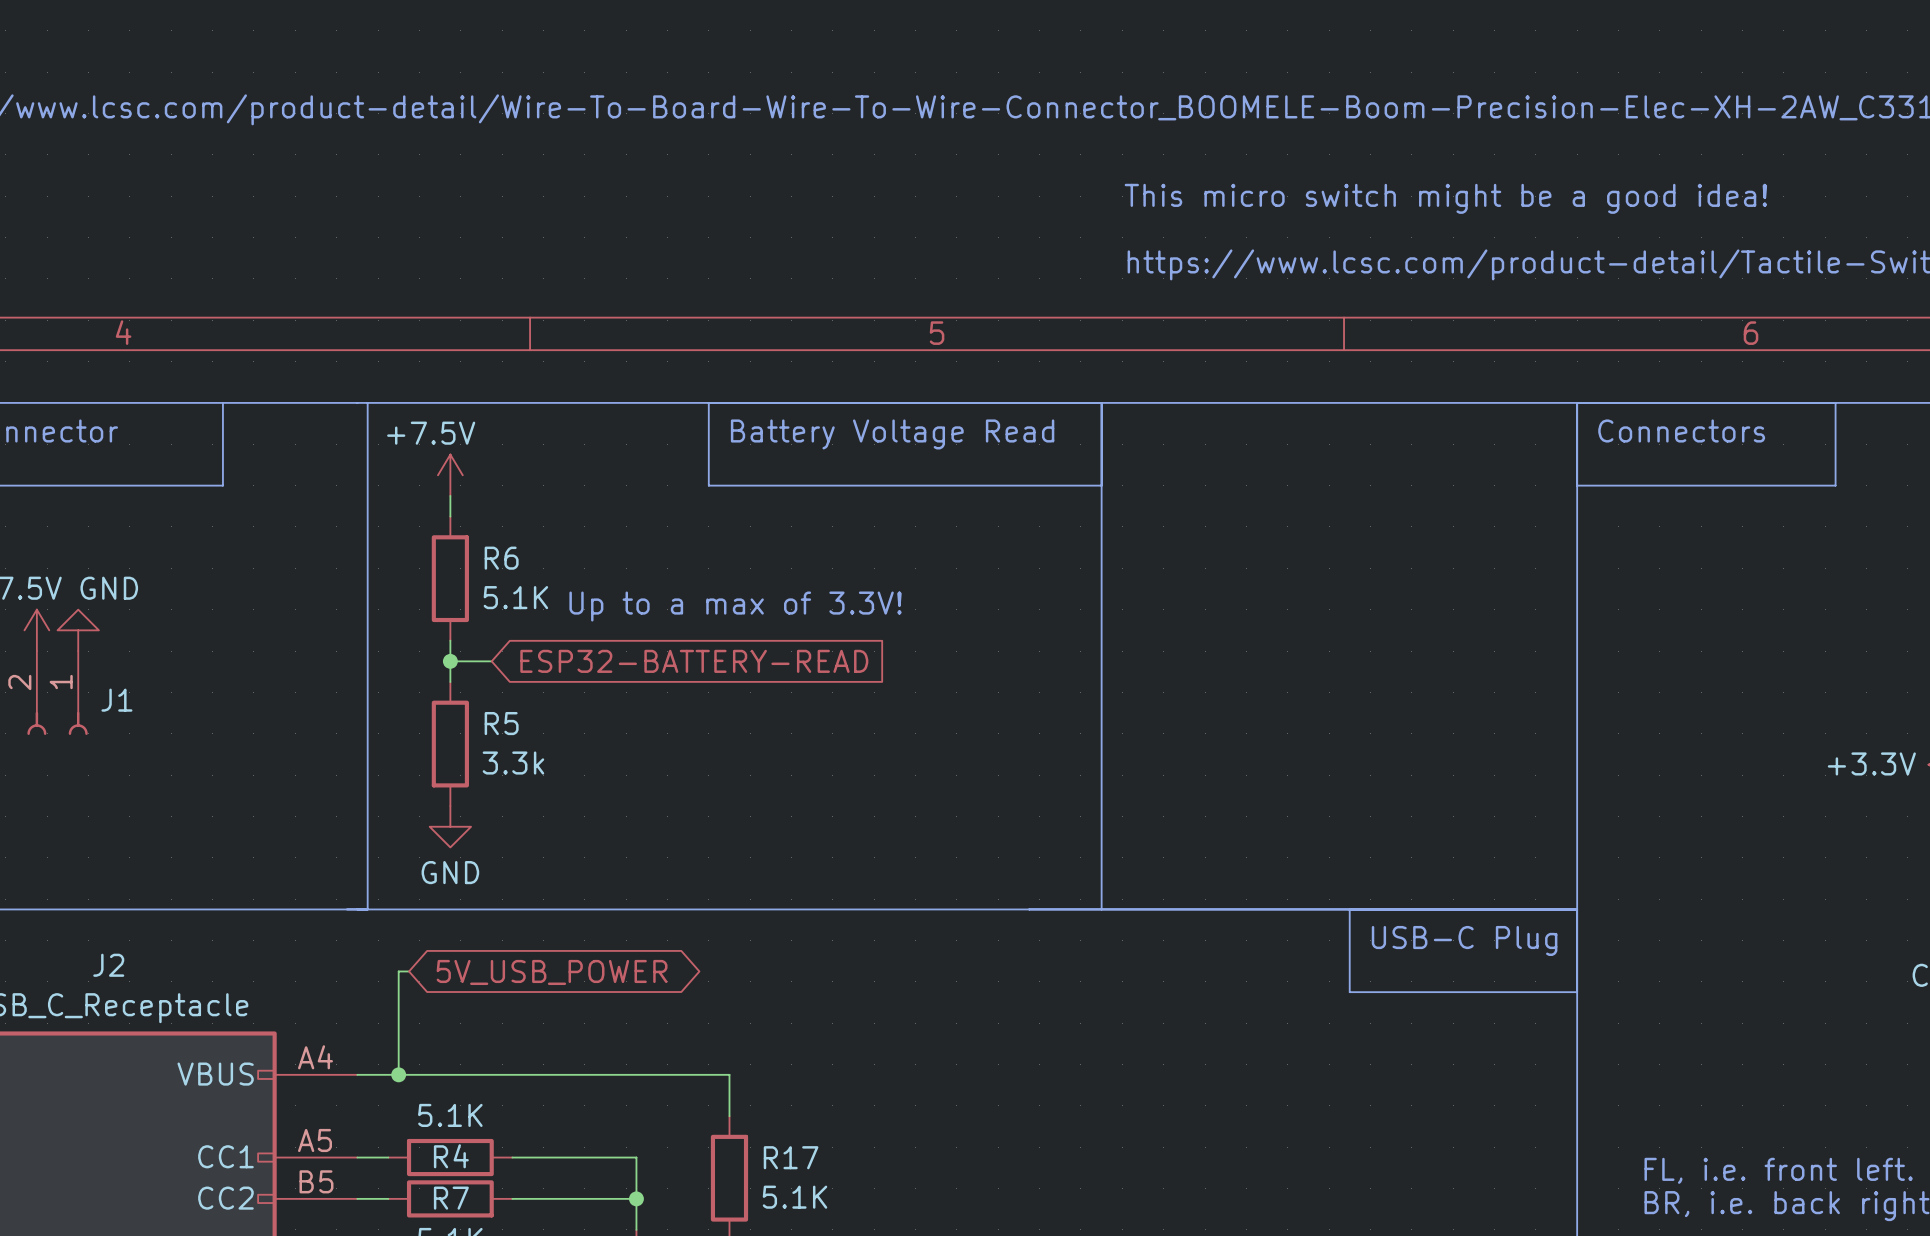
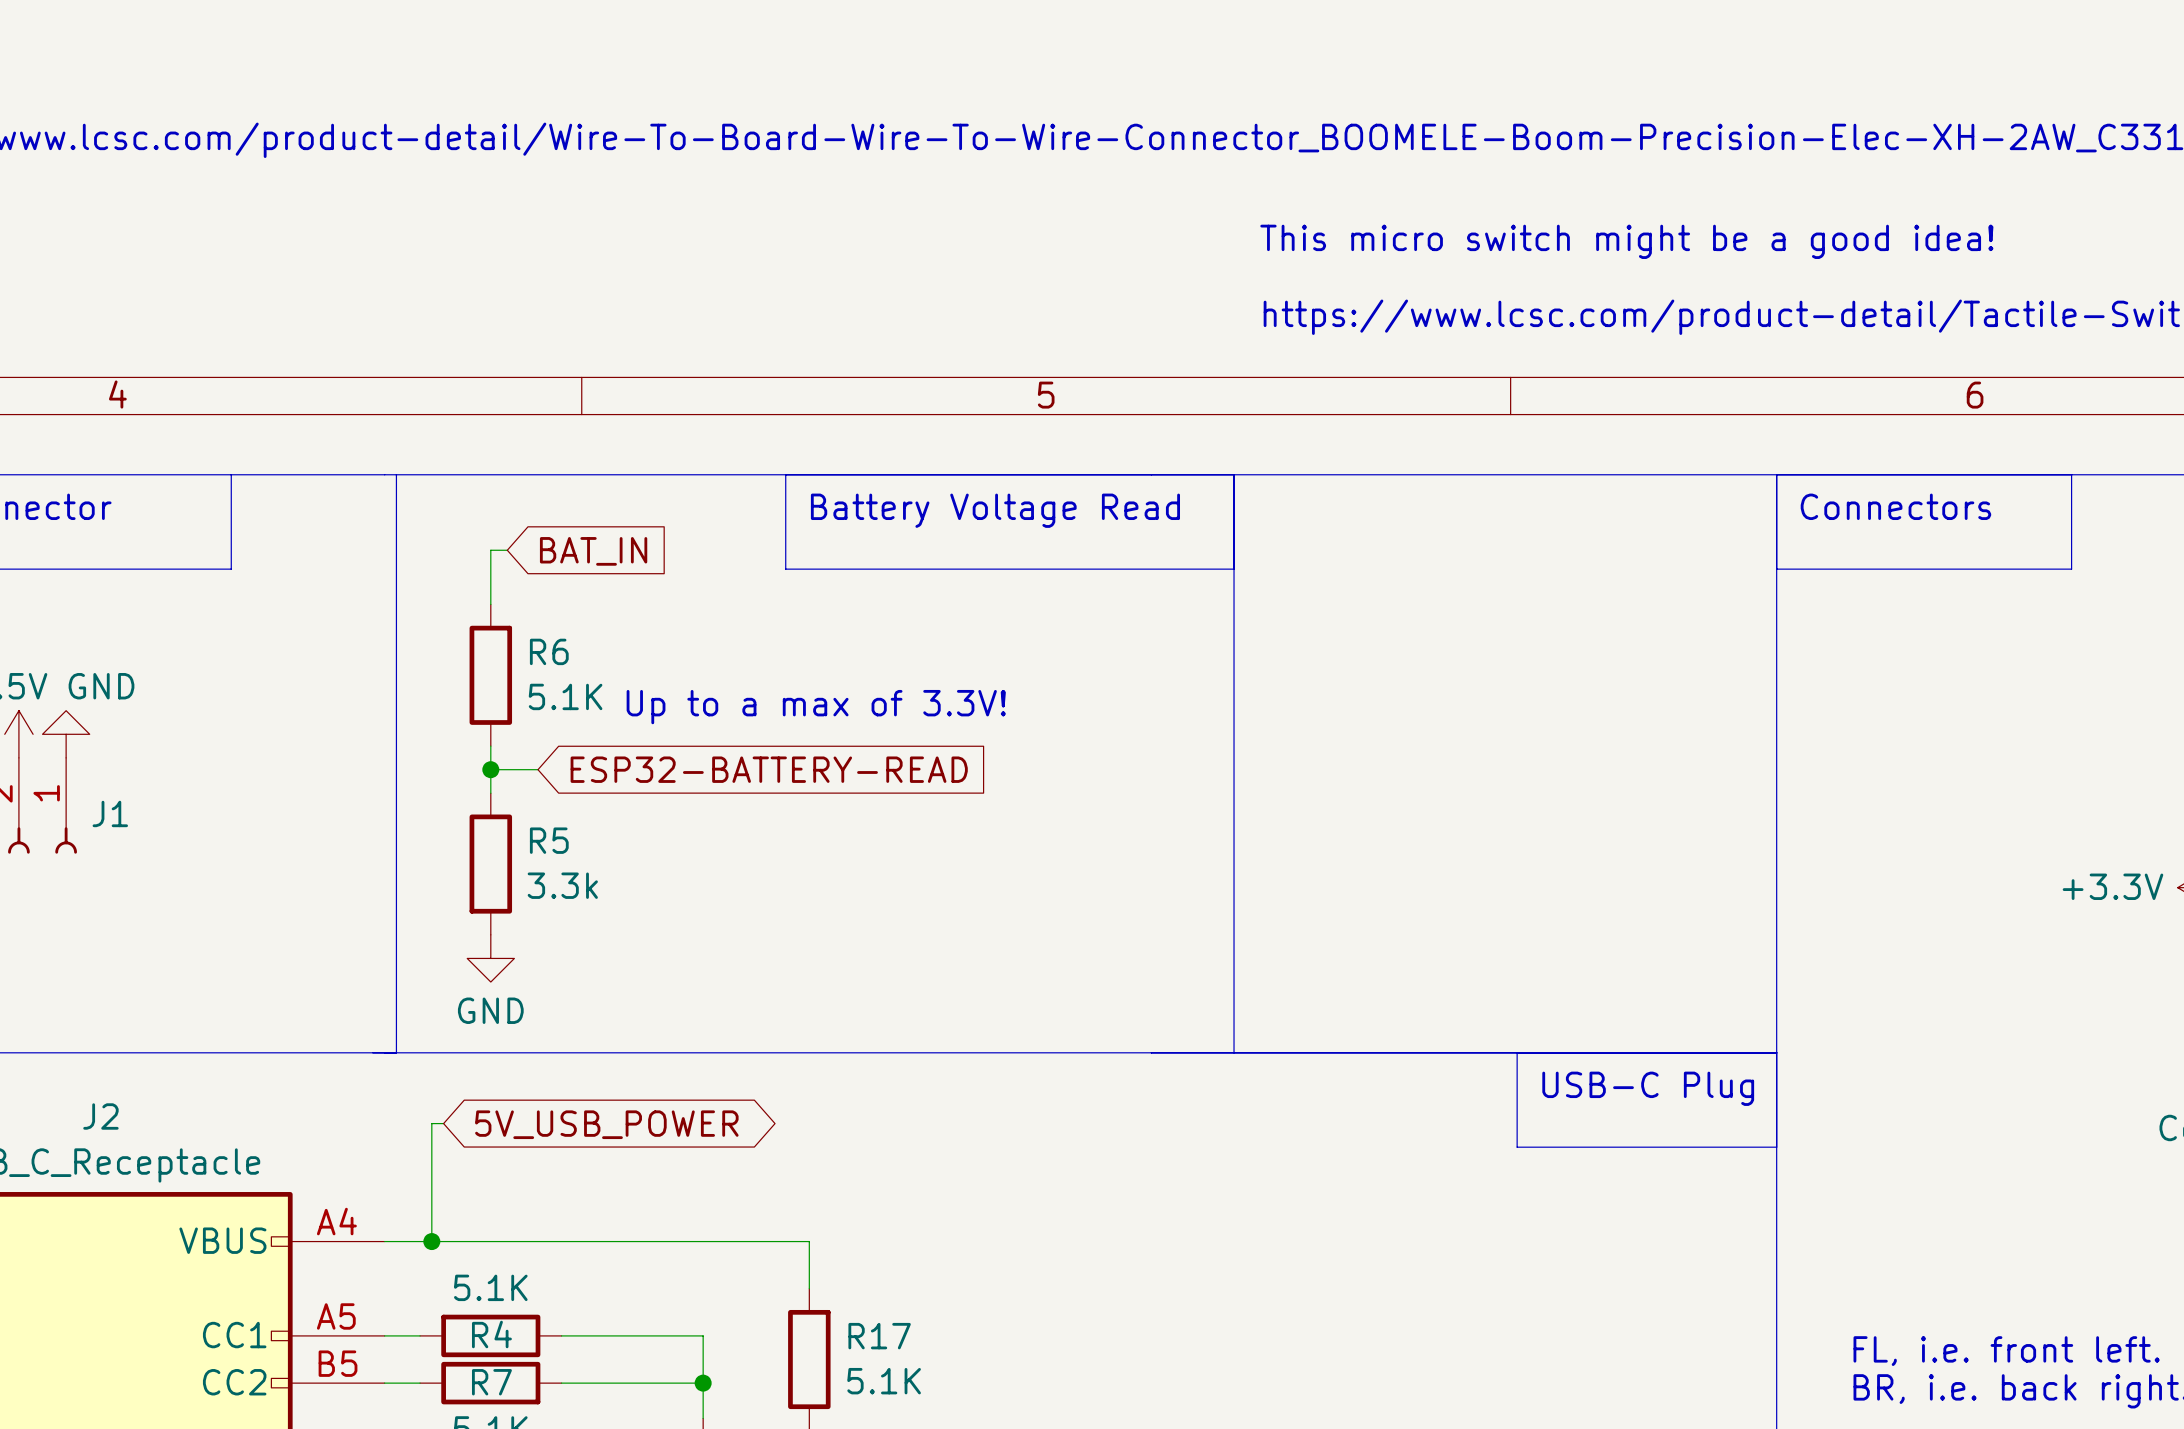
global label: none -> BAT_IN (593, 551)
power symbol: +7.5V (450, 475) -> none

